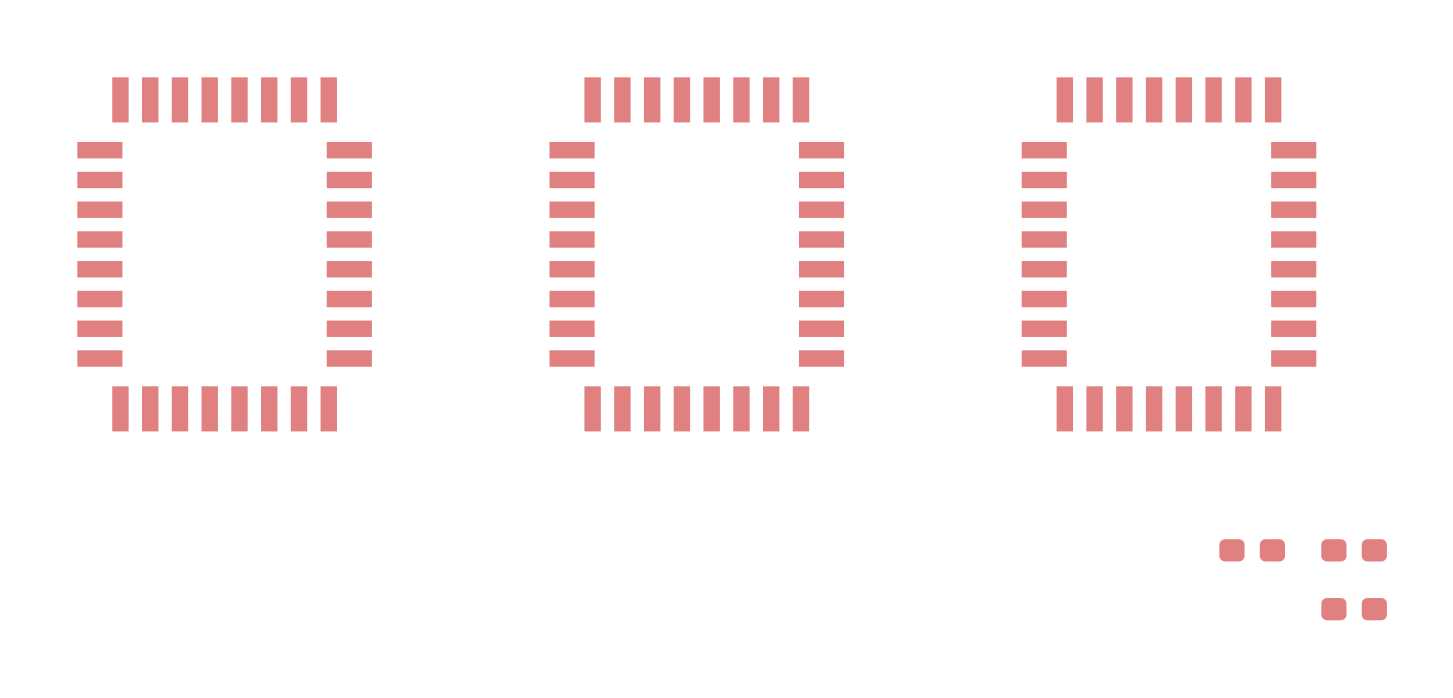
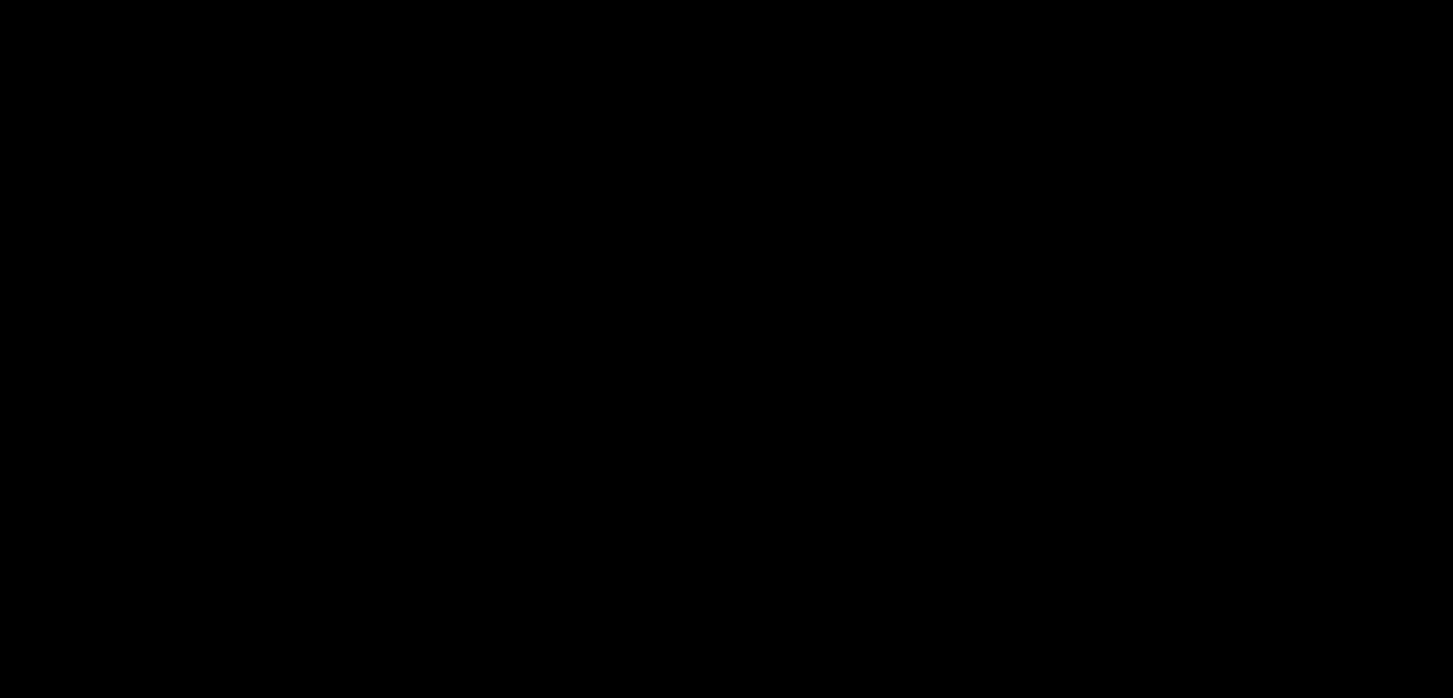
part: (224, 254) -> none
part: (696, 254) -> none
part: (1168, 254) -> none
part: (1252, 550) -> none
part: (1354, 550) -> none
part: (1354, 609) -> none

